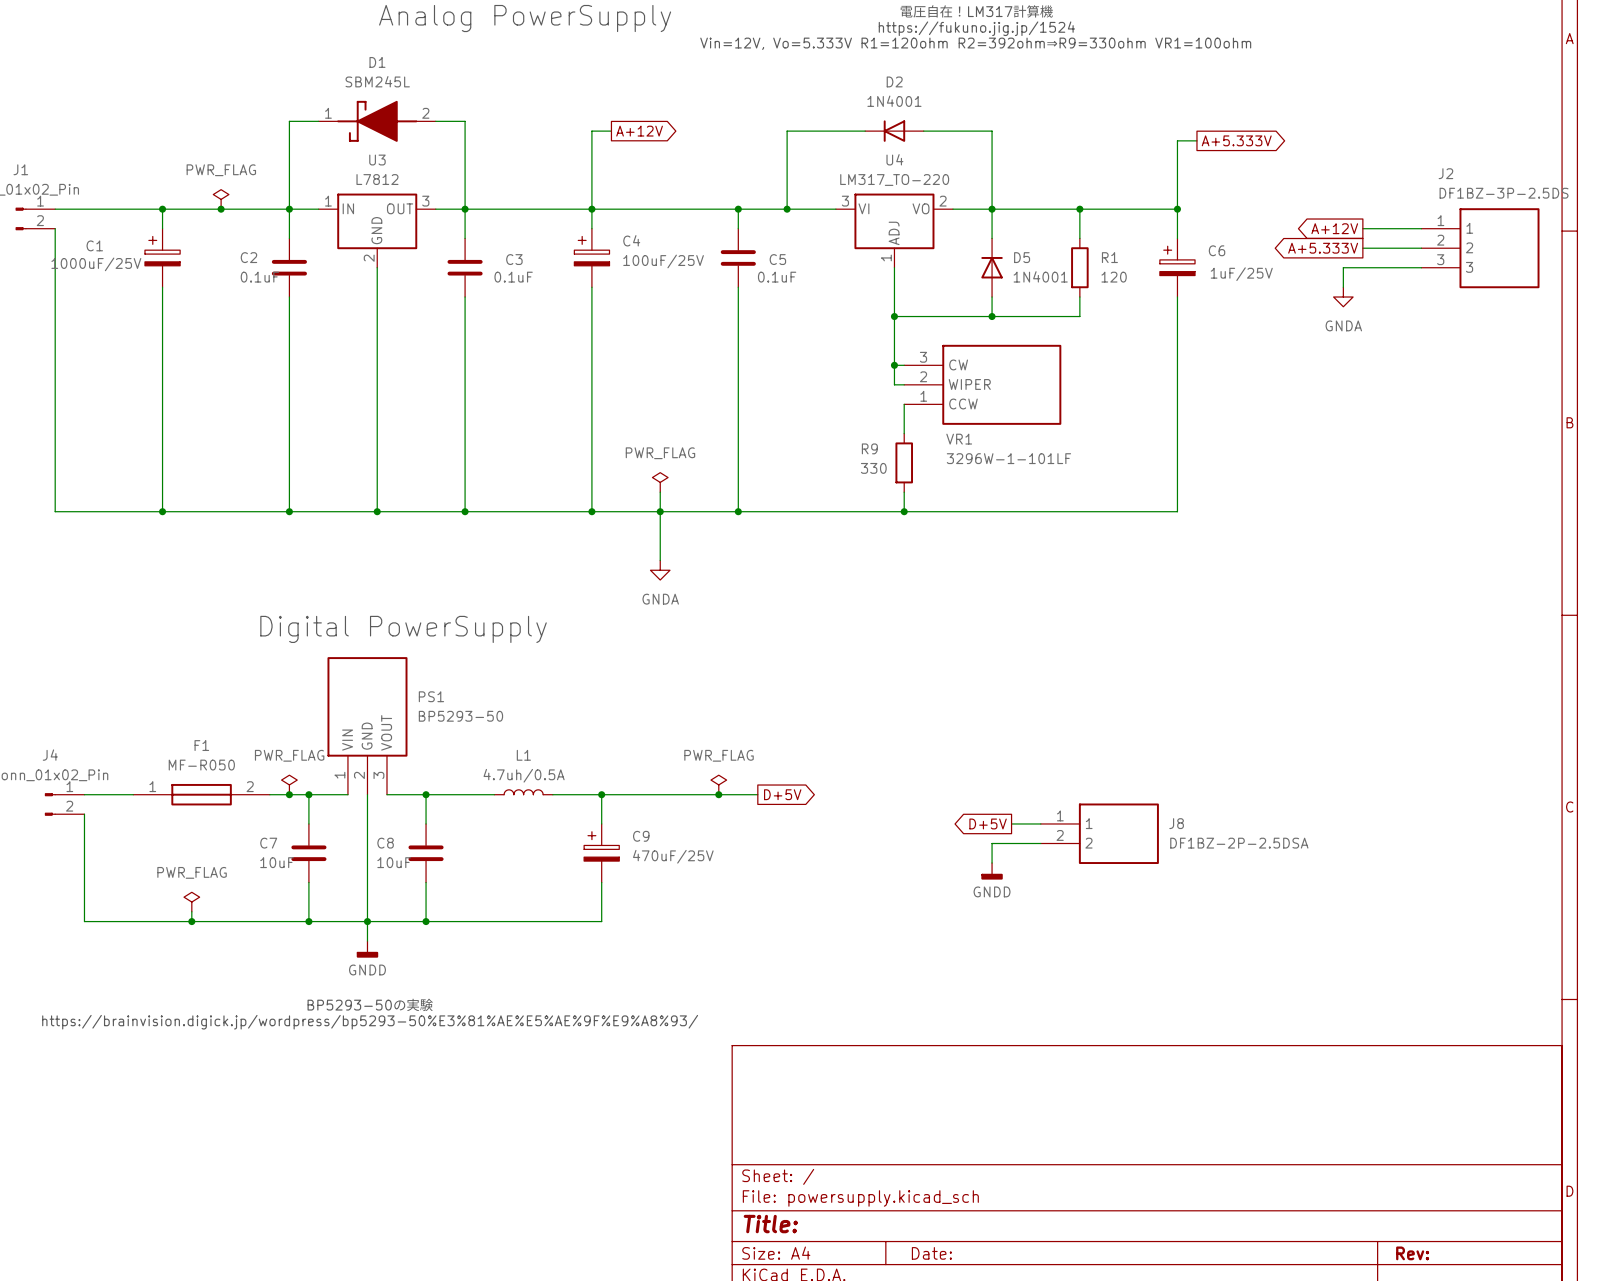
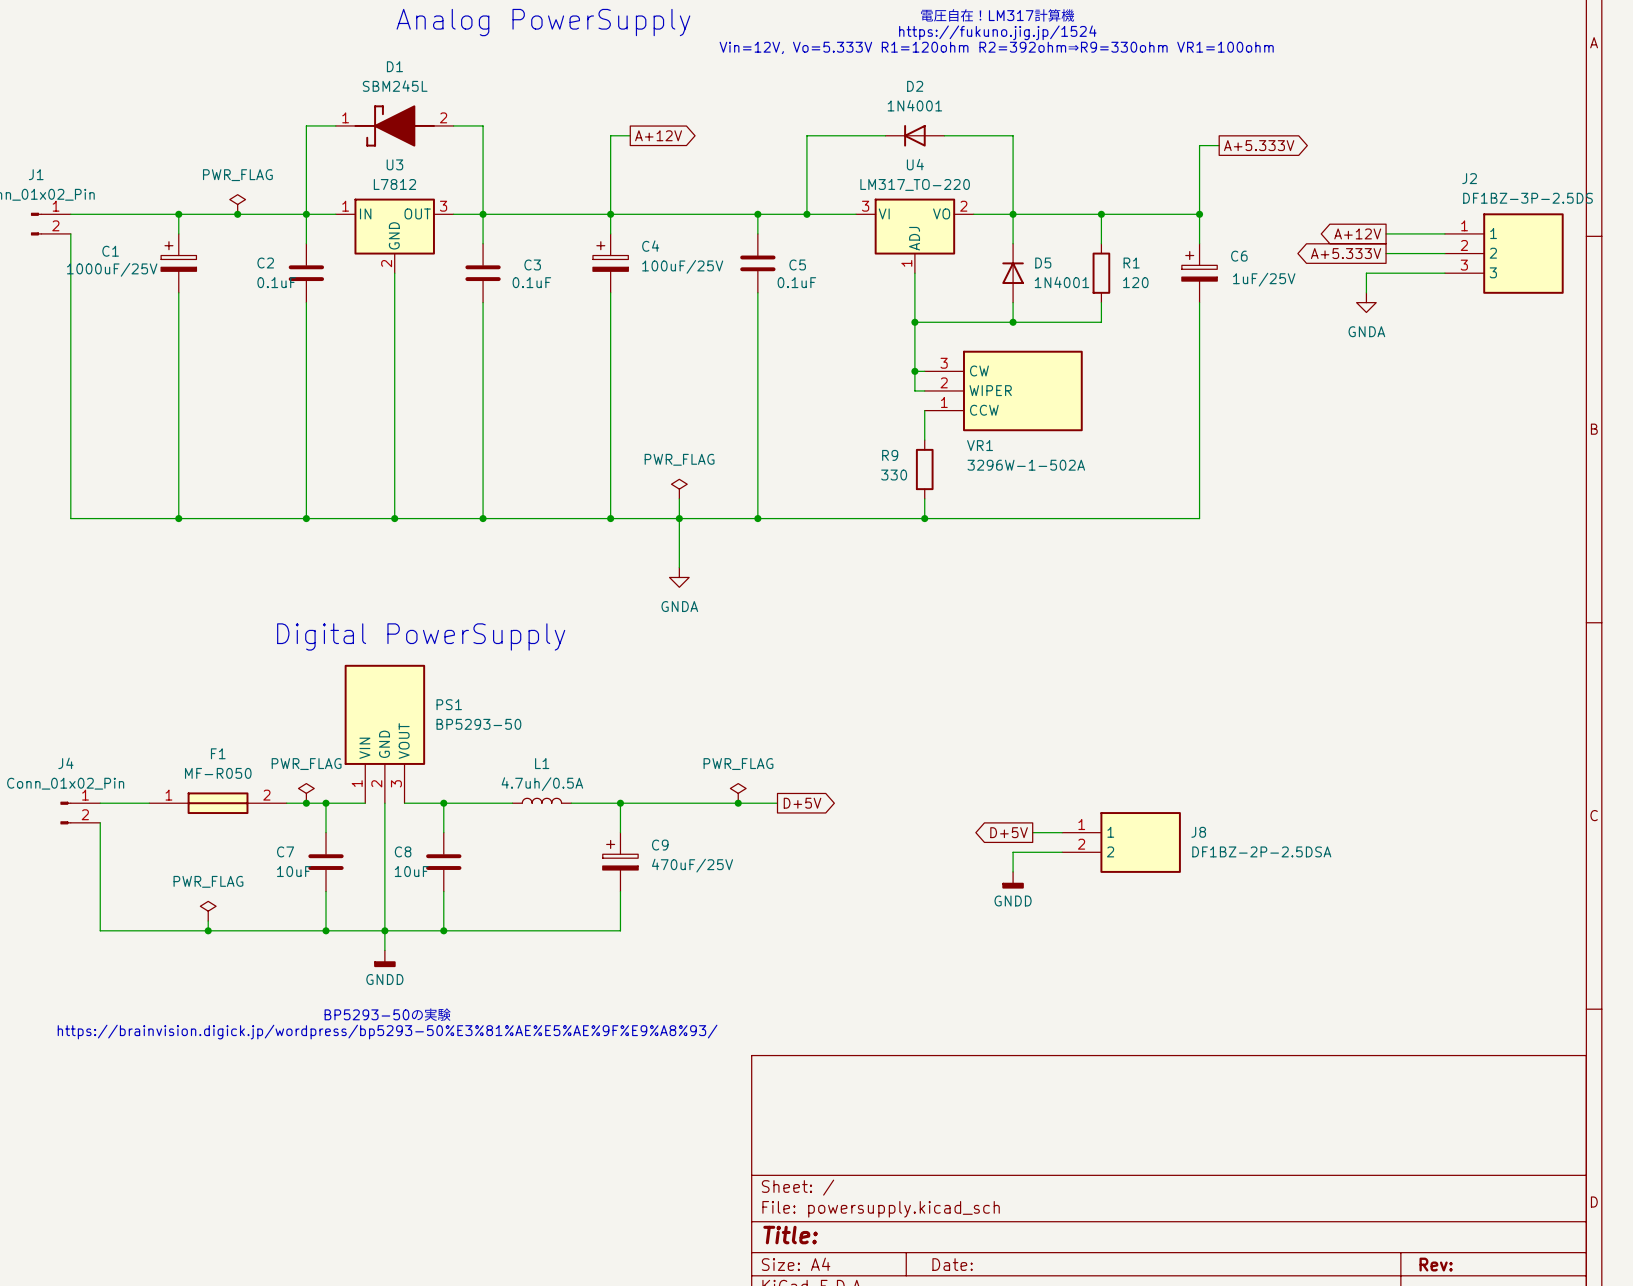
VR1 value: 3296W-1-101LF (1008, 458) -> 3296W-1-502A (1026, 465)

